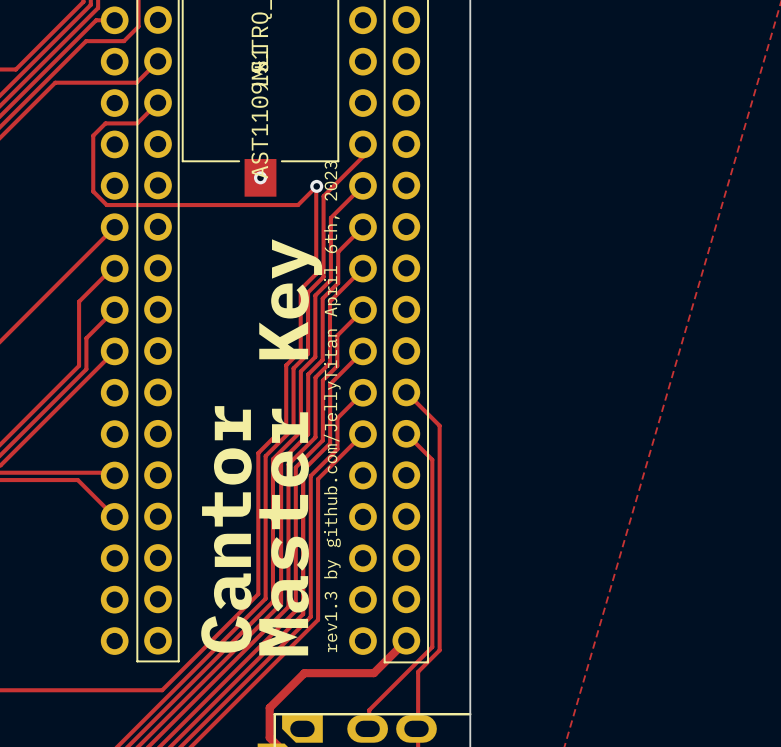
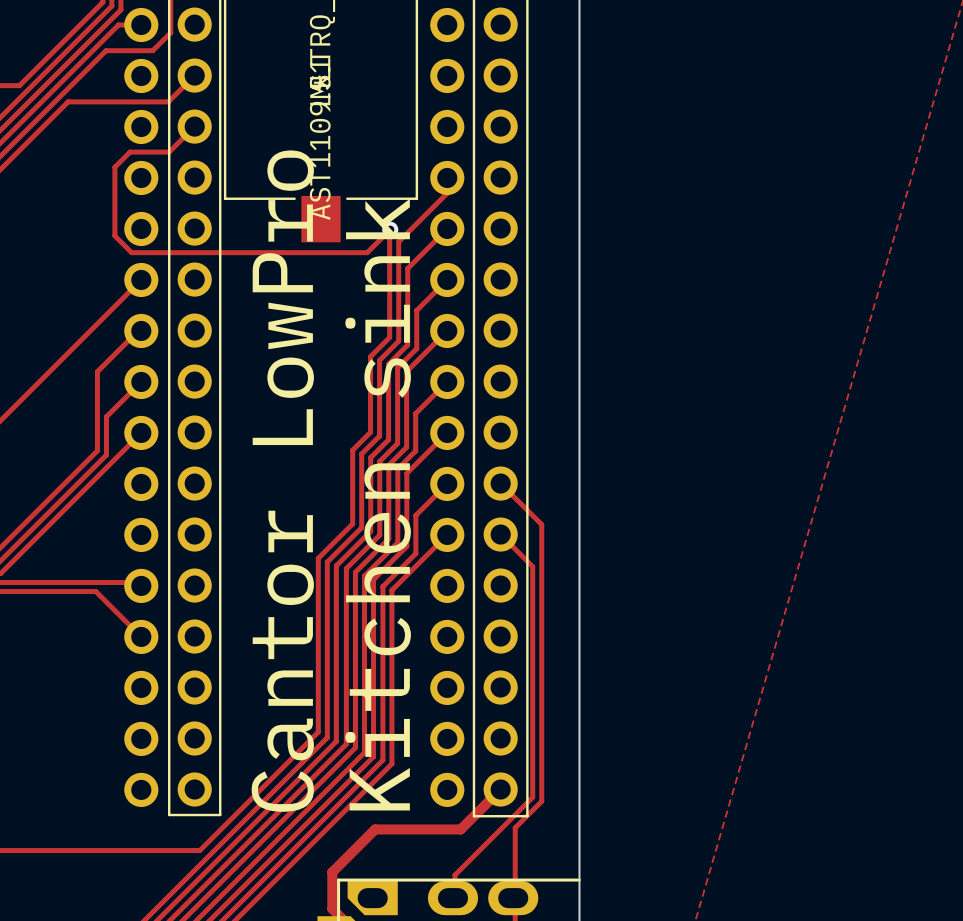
via: (260, 177) -> none
text: rev1.3 by github.com/JellyTitan April 6th, 2023 (332, 406) -> none
text: none -> Kitchen sink (378, 504)
text: Master Key (290, 447) -> none
text: Cantor (226, 529) -> Cantor LowPro (282, 481)

